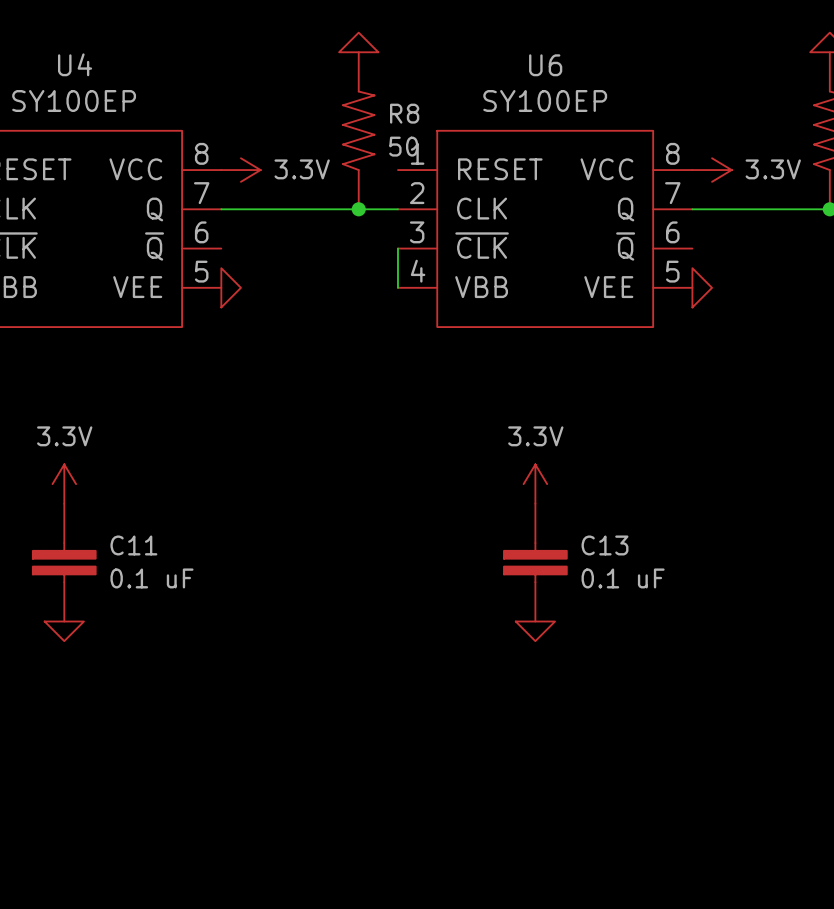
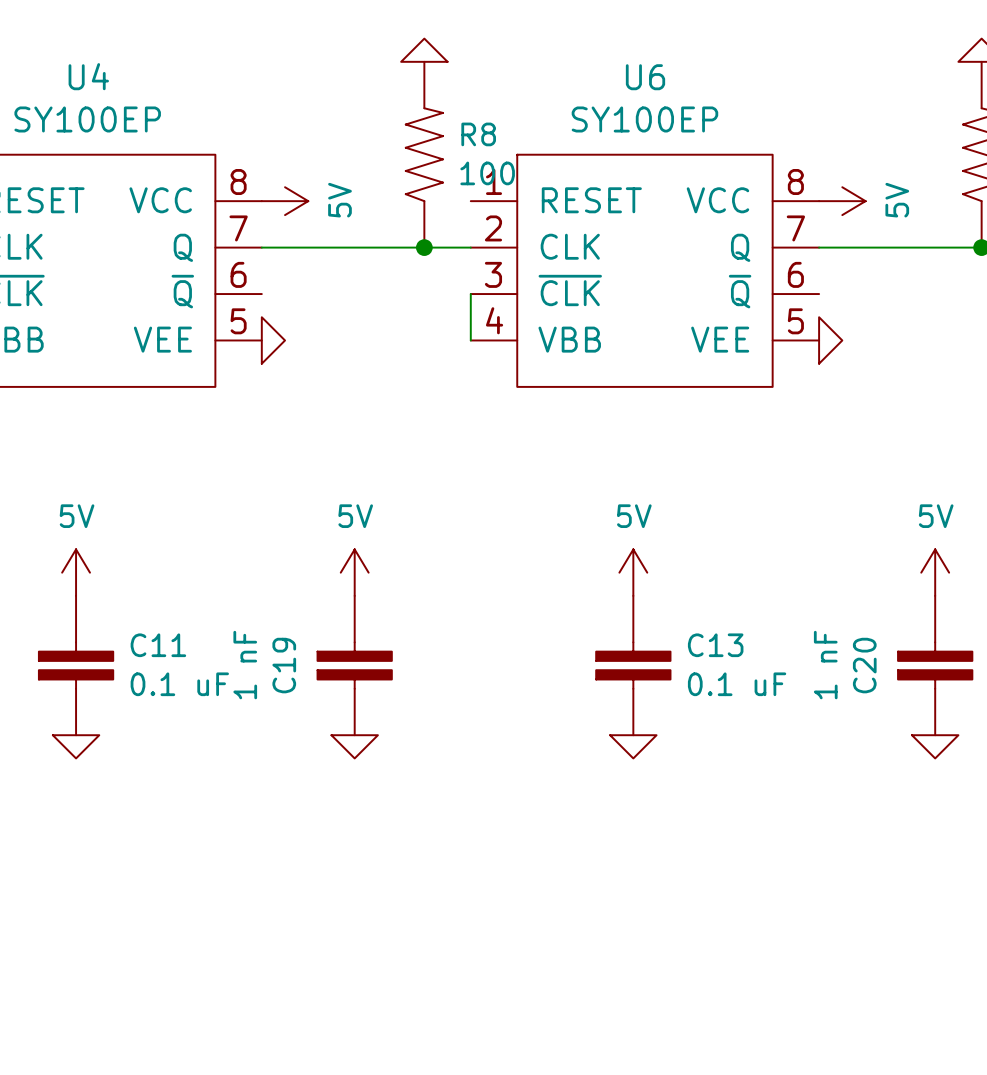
R8 value: 50 (403, 146) -> 100 (487, 173)
power symbol: 3.3V (240, 170) -> 5V (285, 201)
power symbol: 3.3V (712, 170) -> 5V (842, 201)
power symbol: 3.3V (64, 484) -> 5V (76, 572)
power symbol: none -> 5V (354, 572)
power symbol: 3.3V (535, 484) -> 5V (633, 572)
power symbol: none -> 5V (935, 572)
C19: none -> 1 nF (354, 665)
C20: none -> 1 nF (935, 665)
power symbol: none -> (354, 746)
power symbol: none -> (935, 746)

